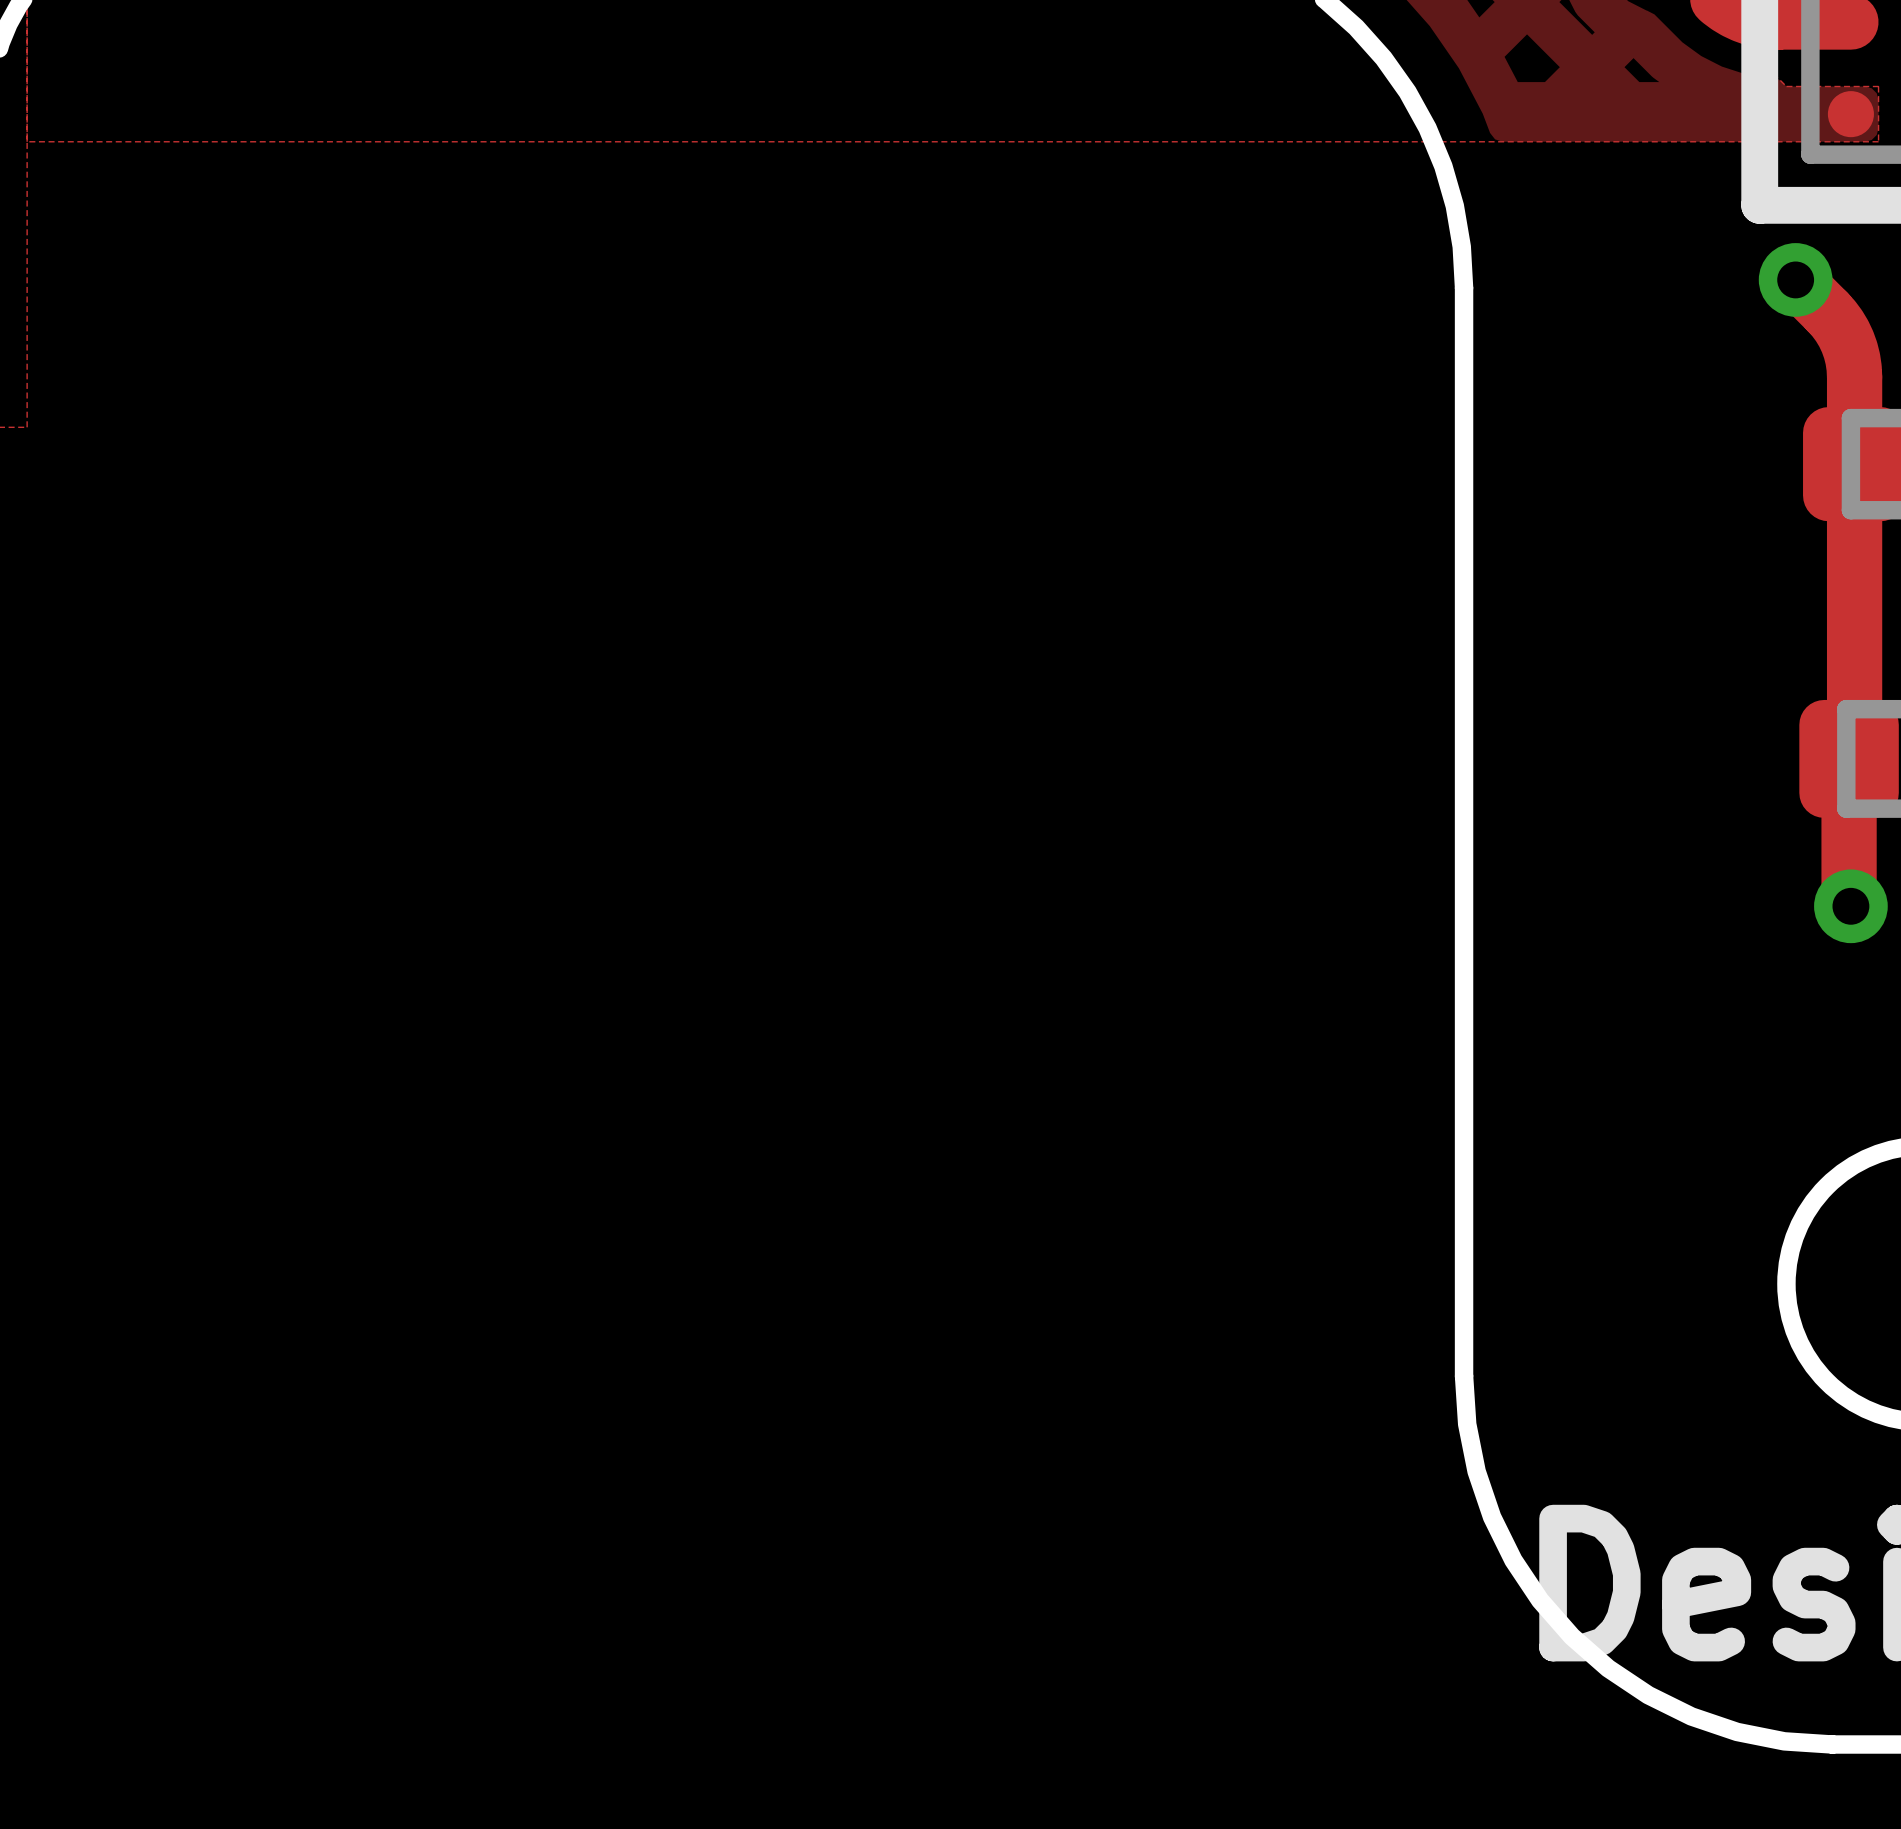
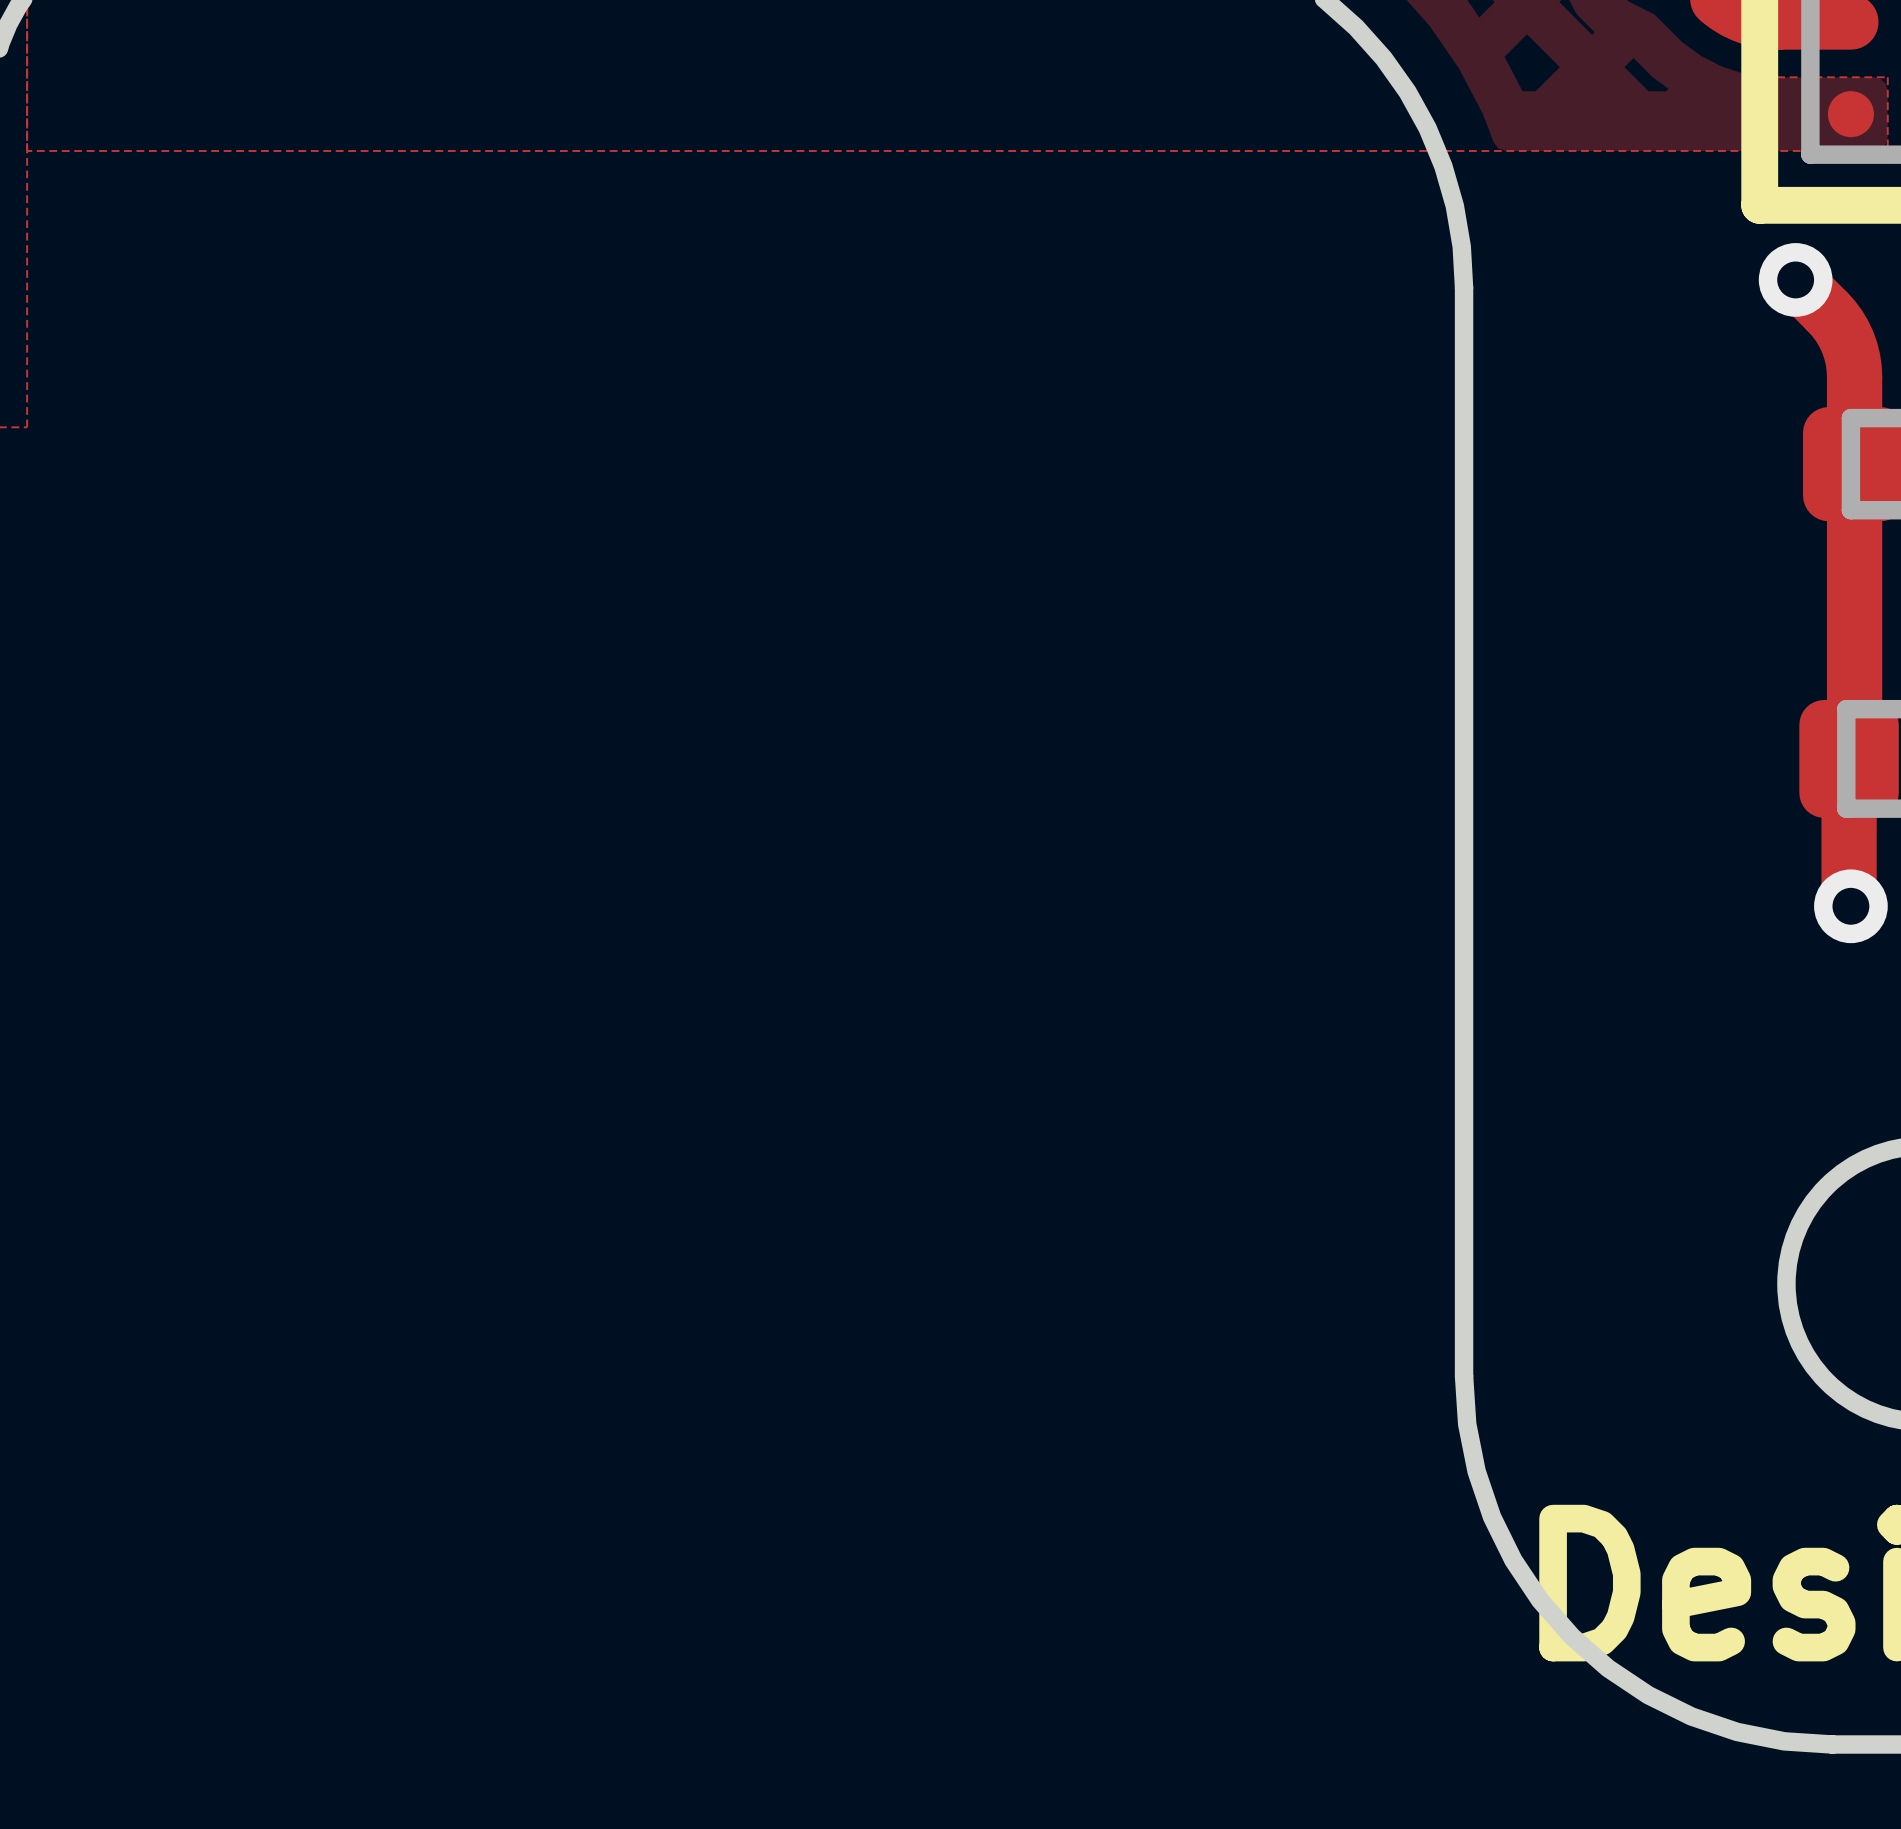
zone outline: (1777, 77) (1786, 86) (1878, 86) (1878, 141) (27, 141) -> (1777, 77) (1887, 77) (1887, 150) (27, 150)

